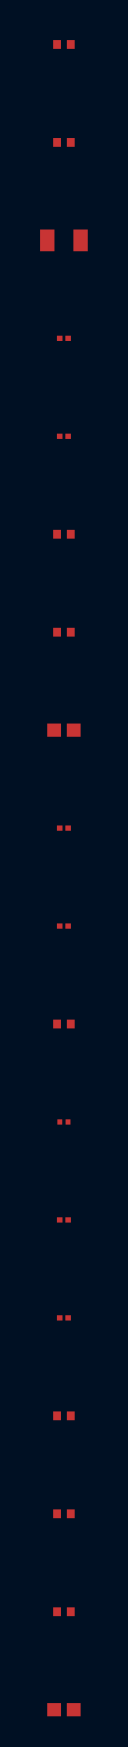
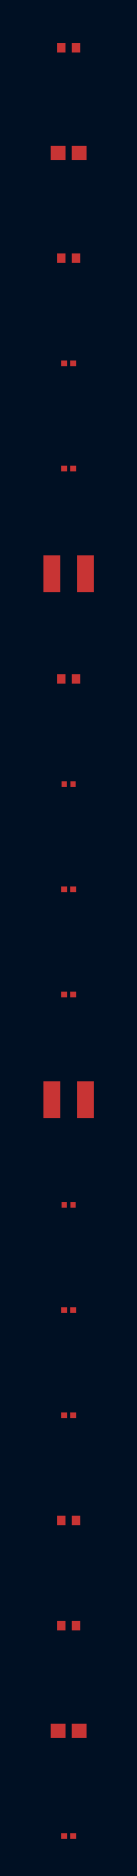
part footprint: [53, 138, 75, 147] -> [50, 145, 87, 161]
part footprint: [40, 229, 88, 252] -> [57, 253, 81, 263]
part footprint: [53, 529, 75, 539] -> [43, 555, 94, 593]
part footprint: [47, 723, 81, 737] -> [61, 781, 76, 787]
part footprint: [53, 1019, 75, 1029] -> [43, 1081, 94, 1119]
part footprint: [53, 1607, 75, 1617] -> [50, 1723, 87, 1738]
part footprint: [47, 1703, 81, 1717] -> [61, 1833, 77, 1839]

